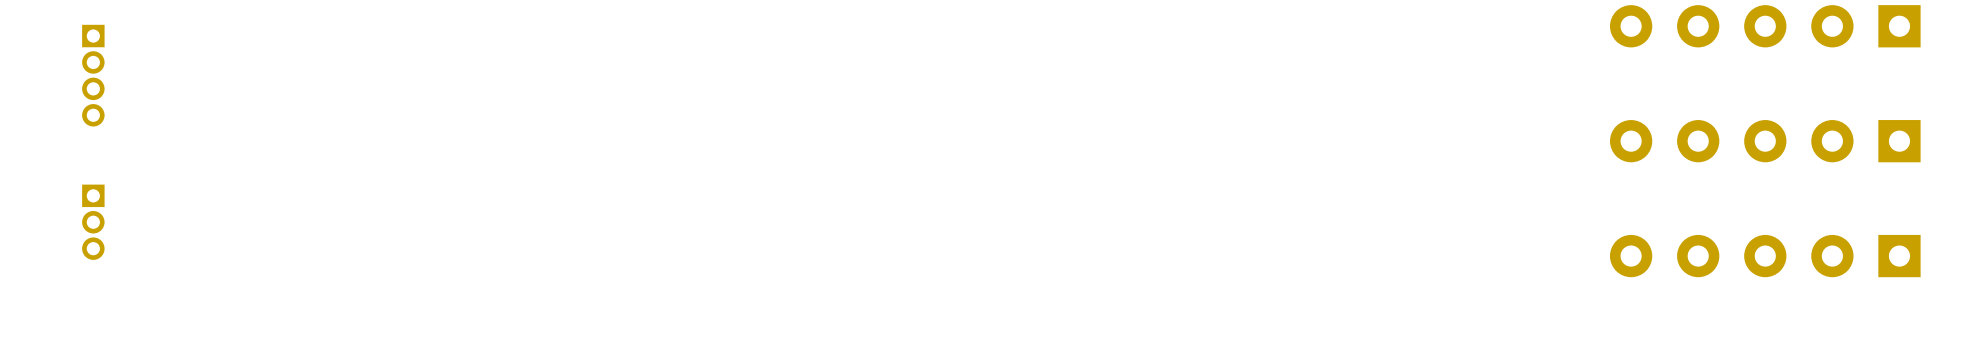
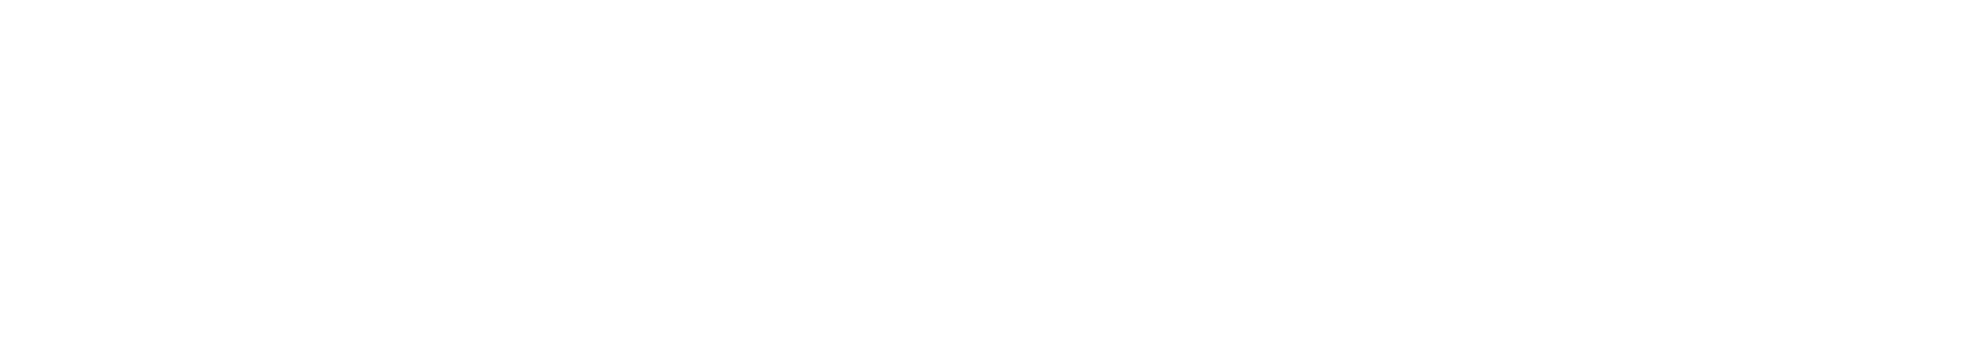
part: (1765, 26) -> none
part: (93, 75) -> none
part: (1765, 141) -> none
part: (93, 222) -> none
part: (1765, 256) -> none

